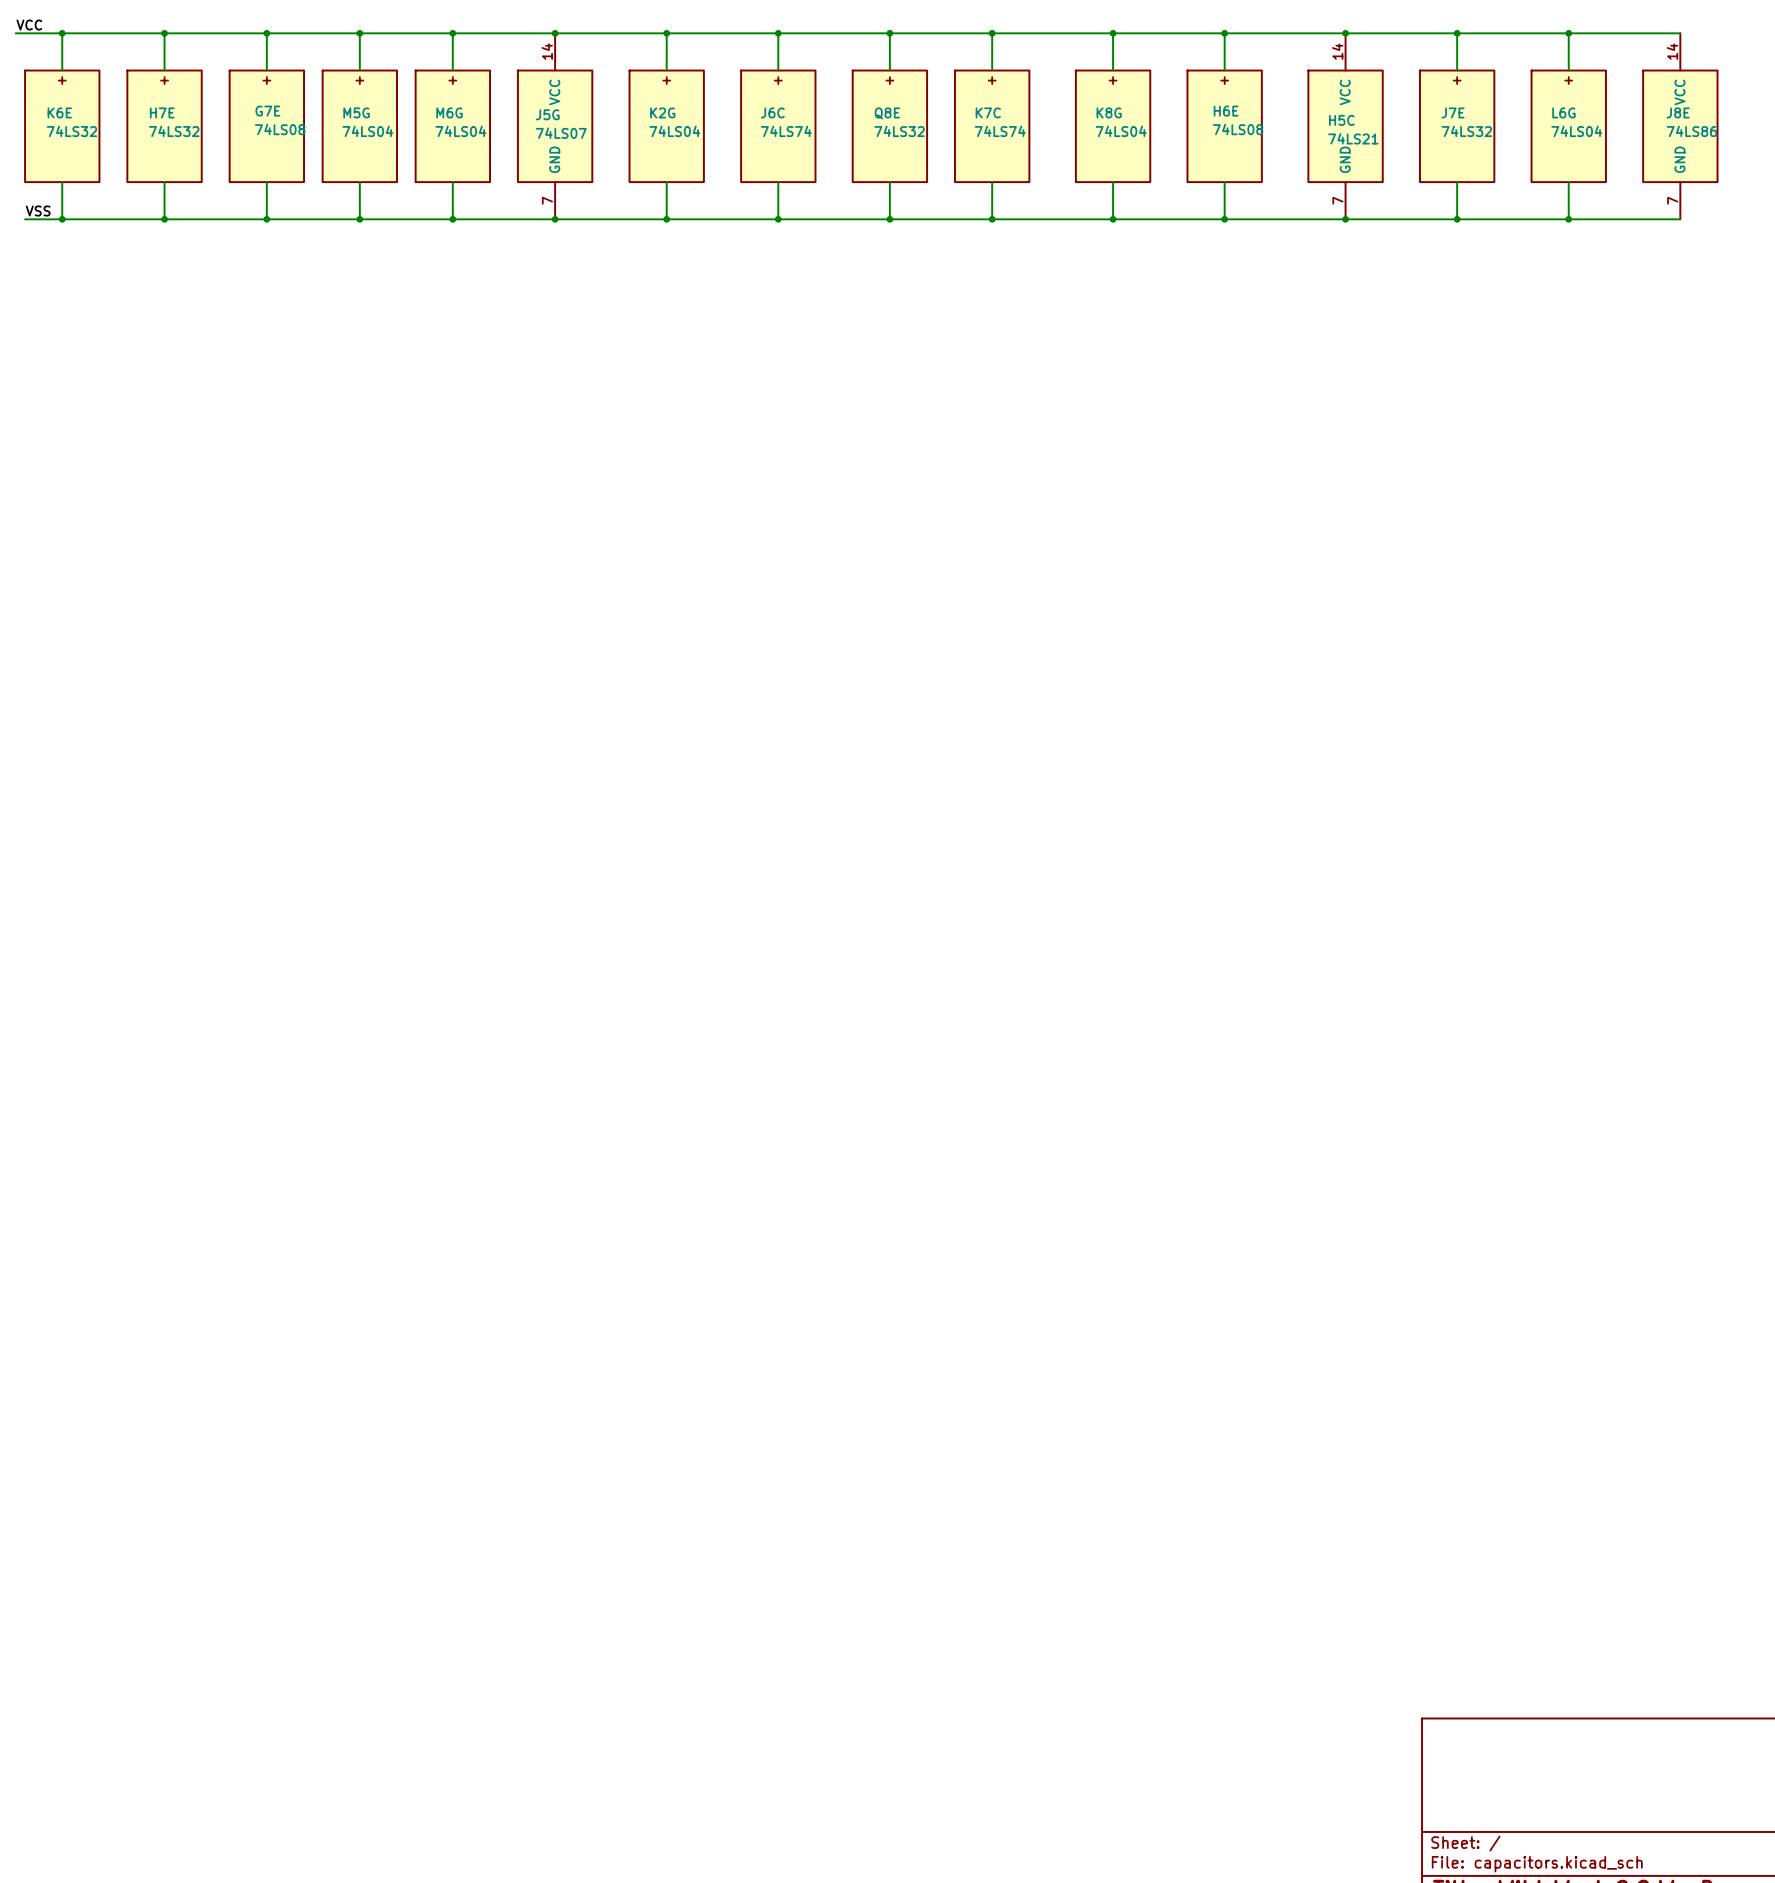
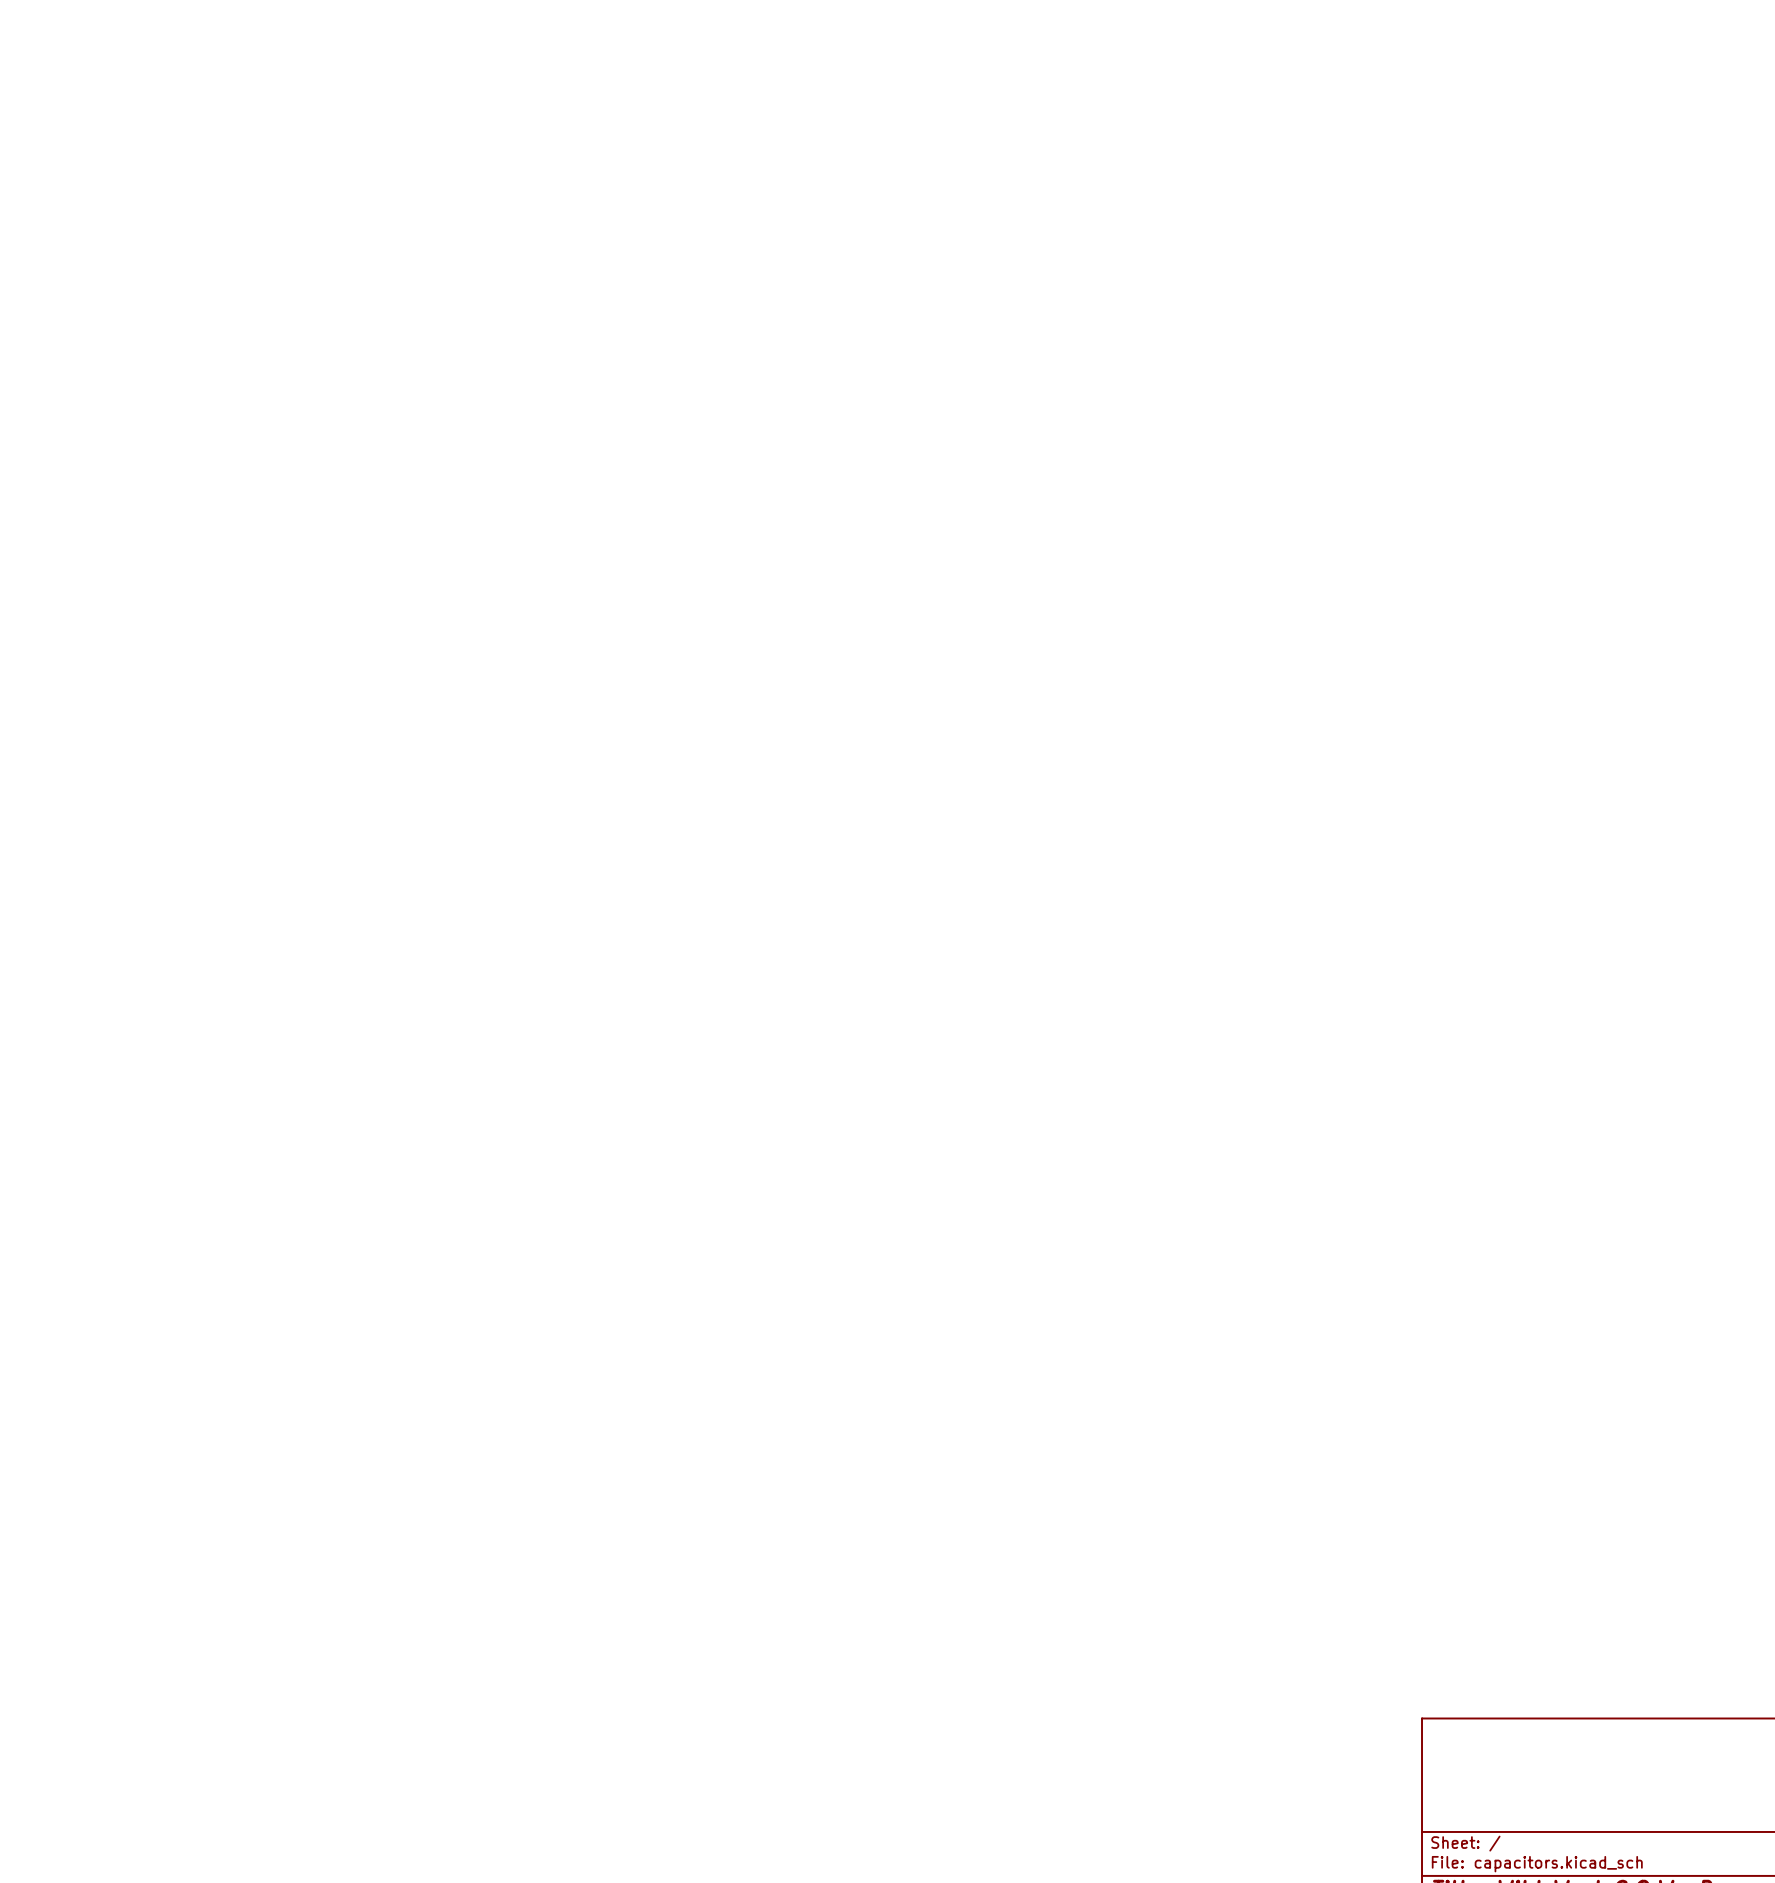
label: VCC (29, 25) -> none
wire: (15, 33) (1680, 33) -> none
wire: (62, 33) (62, 70) -> none
junction: (62, 33) -> none
wire: (164, 33) (164, 70) -> none
junction: (164, 33) -> none
wire: (266, 33) (266, 70) -> none
junction: (266, 33) -> none
wire: (359, 33) (359, 70) -> none
junction: (359, 33) -> none
wire: (452, 33) (452, 70) -> none
junction: (452, 33) -> none
junction: (555, 33) -> none
wire: (666, 33) (666, 70) -> none
junction: (666, 33) -> none
wire: (778, 33) (778, 70) -> none
junction: (778, 33) -> none
wire: (889, 33) (889, 70) -> none
junction: (889, 33) -> none
wire: (992, 33) (992, 70) -> none
junction: (992, 33) -> none
wire: (1113, 33) (1113, 70) -> none
junction: (1113, 33) -> none
wire: (1224, 33) (1224, 70) -> none
junction: (1224, 33) -> none
junction: (1345, 33) -> none
wire: (1457, 33) (1457, 70) -> none
junction: (1457, 33) -> none
wire: (1568, 33) (1568, 70) -> none
junction: (1568, 33) -> none
K6E: 74LS32 (62, 126) -> none
H7E: 74LS32 (164, 126) -> none
G7E: 74LS08 (266, 126) -> none
M5G: 74LS04 (359, 126) -> none
M6G: 74LS04 (452, 126) -> none
J5G: 74LS07 (555, 126) -> none
K2G: 74LS04 (666, 126) -> none
J6C: 74LS74 (778, 126) -> none
Q8E: 74LS32 (889, 126) -> none
K7C: 74LS74 (992, 126) -> none
K8G: 74LS04 (1113, 126) -> none
H6E: 74LS08 (1224, 126) -> none
H5C: 74LS21 (1345, 126) -> none
J7E: 74LS32 (1457, 126) -> none
L6G: 74LS04 (1568, 126) -> none
J8E: 74LS86 (1680, 126) -> none
wire: (62, 182) (62, 219) -> none
wire: (164, 182) (164, 219) -> none
wire: (266, 182) (266, 219) -> none
wire: (359, 182) (359, 219) -> none
wire: (452, 182) (452, 219) -> none
wire: (666, 182) (666, 219) -> none
wire: (778, 182) (778, 219) -> none
wire: (889, 182) (889, 219) -> none
wire: (992, 182) (992, 219) -> none
wire: (1113, 182) (1113, 219) -> none
wire: (1224, 182) (1224, 219) -> none
wire: (1457, 182) (1457, 219) -> none
wire: (1568, 182) (1568, 219) -> none
label: VSS (38, 211) -> none
wire: (25, 219) (1680, 219) -> none
junction: (62, 219) -> none
junction: (164, 219) -> none
junction: (266, 219) -> none
junction: (359, 219) -> none
junction: (452, 219) -> none
junction: (555, 219) -> none
junction: (666, 219) -> none
junction: (778, 219) -> none
junction: (889, 219) -> none
junction: (992, 219) -> none
junction: (1113, 219) -> none
junction: (1224, 219) -> none
junction: (1345, 219) -> none
junction: (1457, 219) -> none
junction: (1568, 219) -> none

